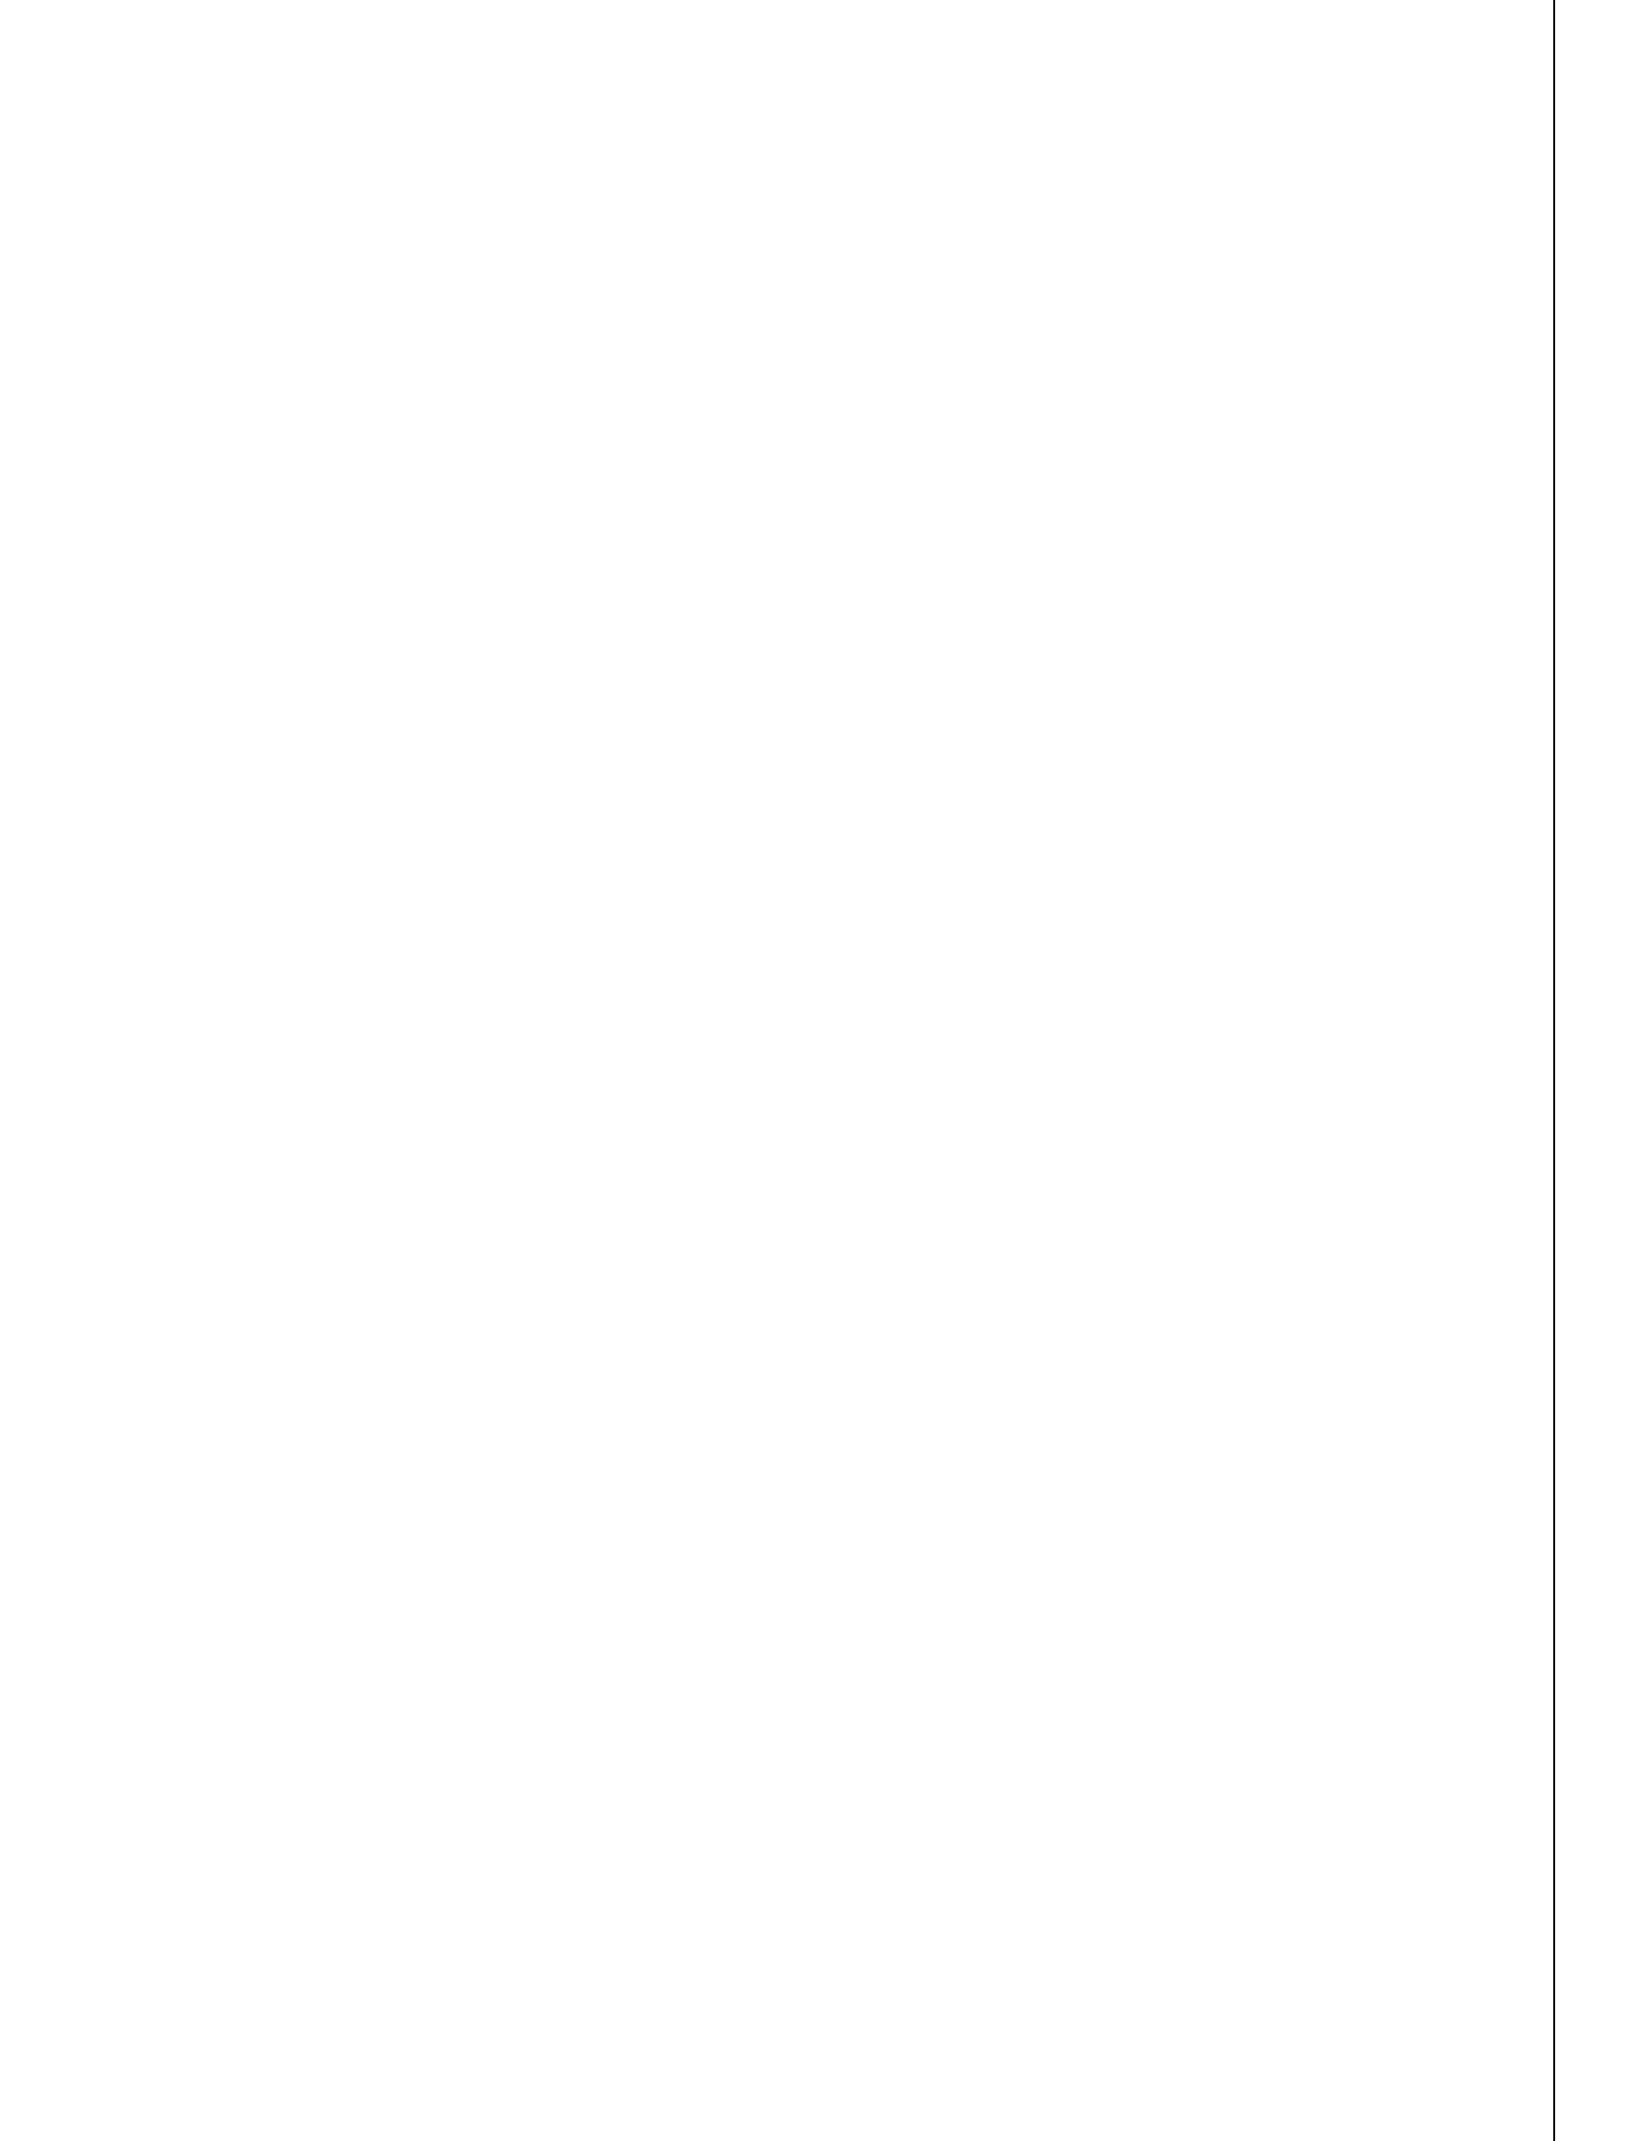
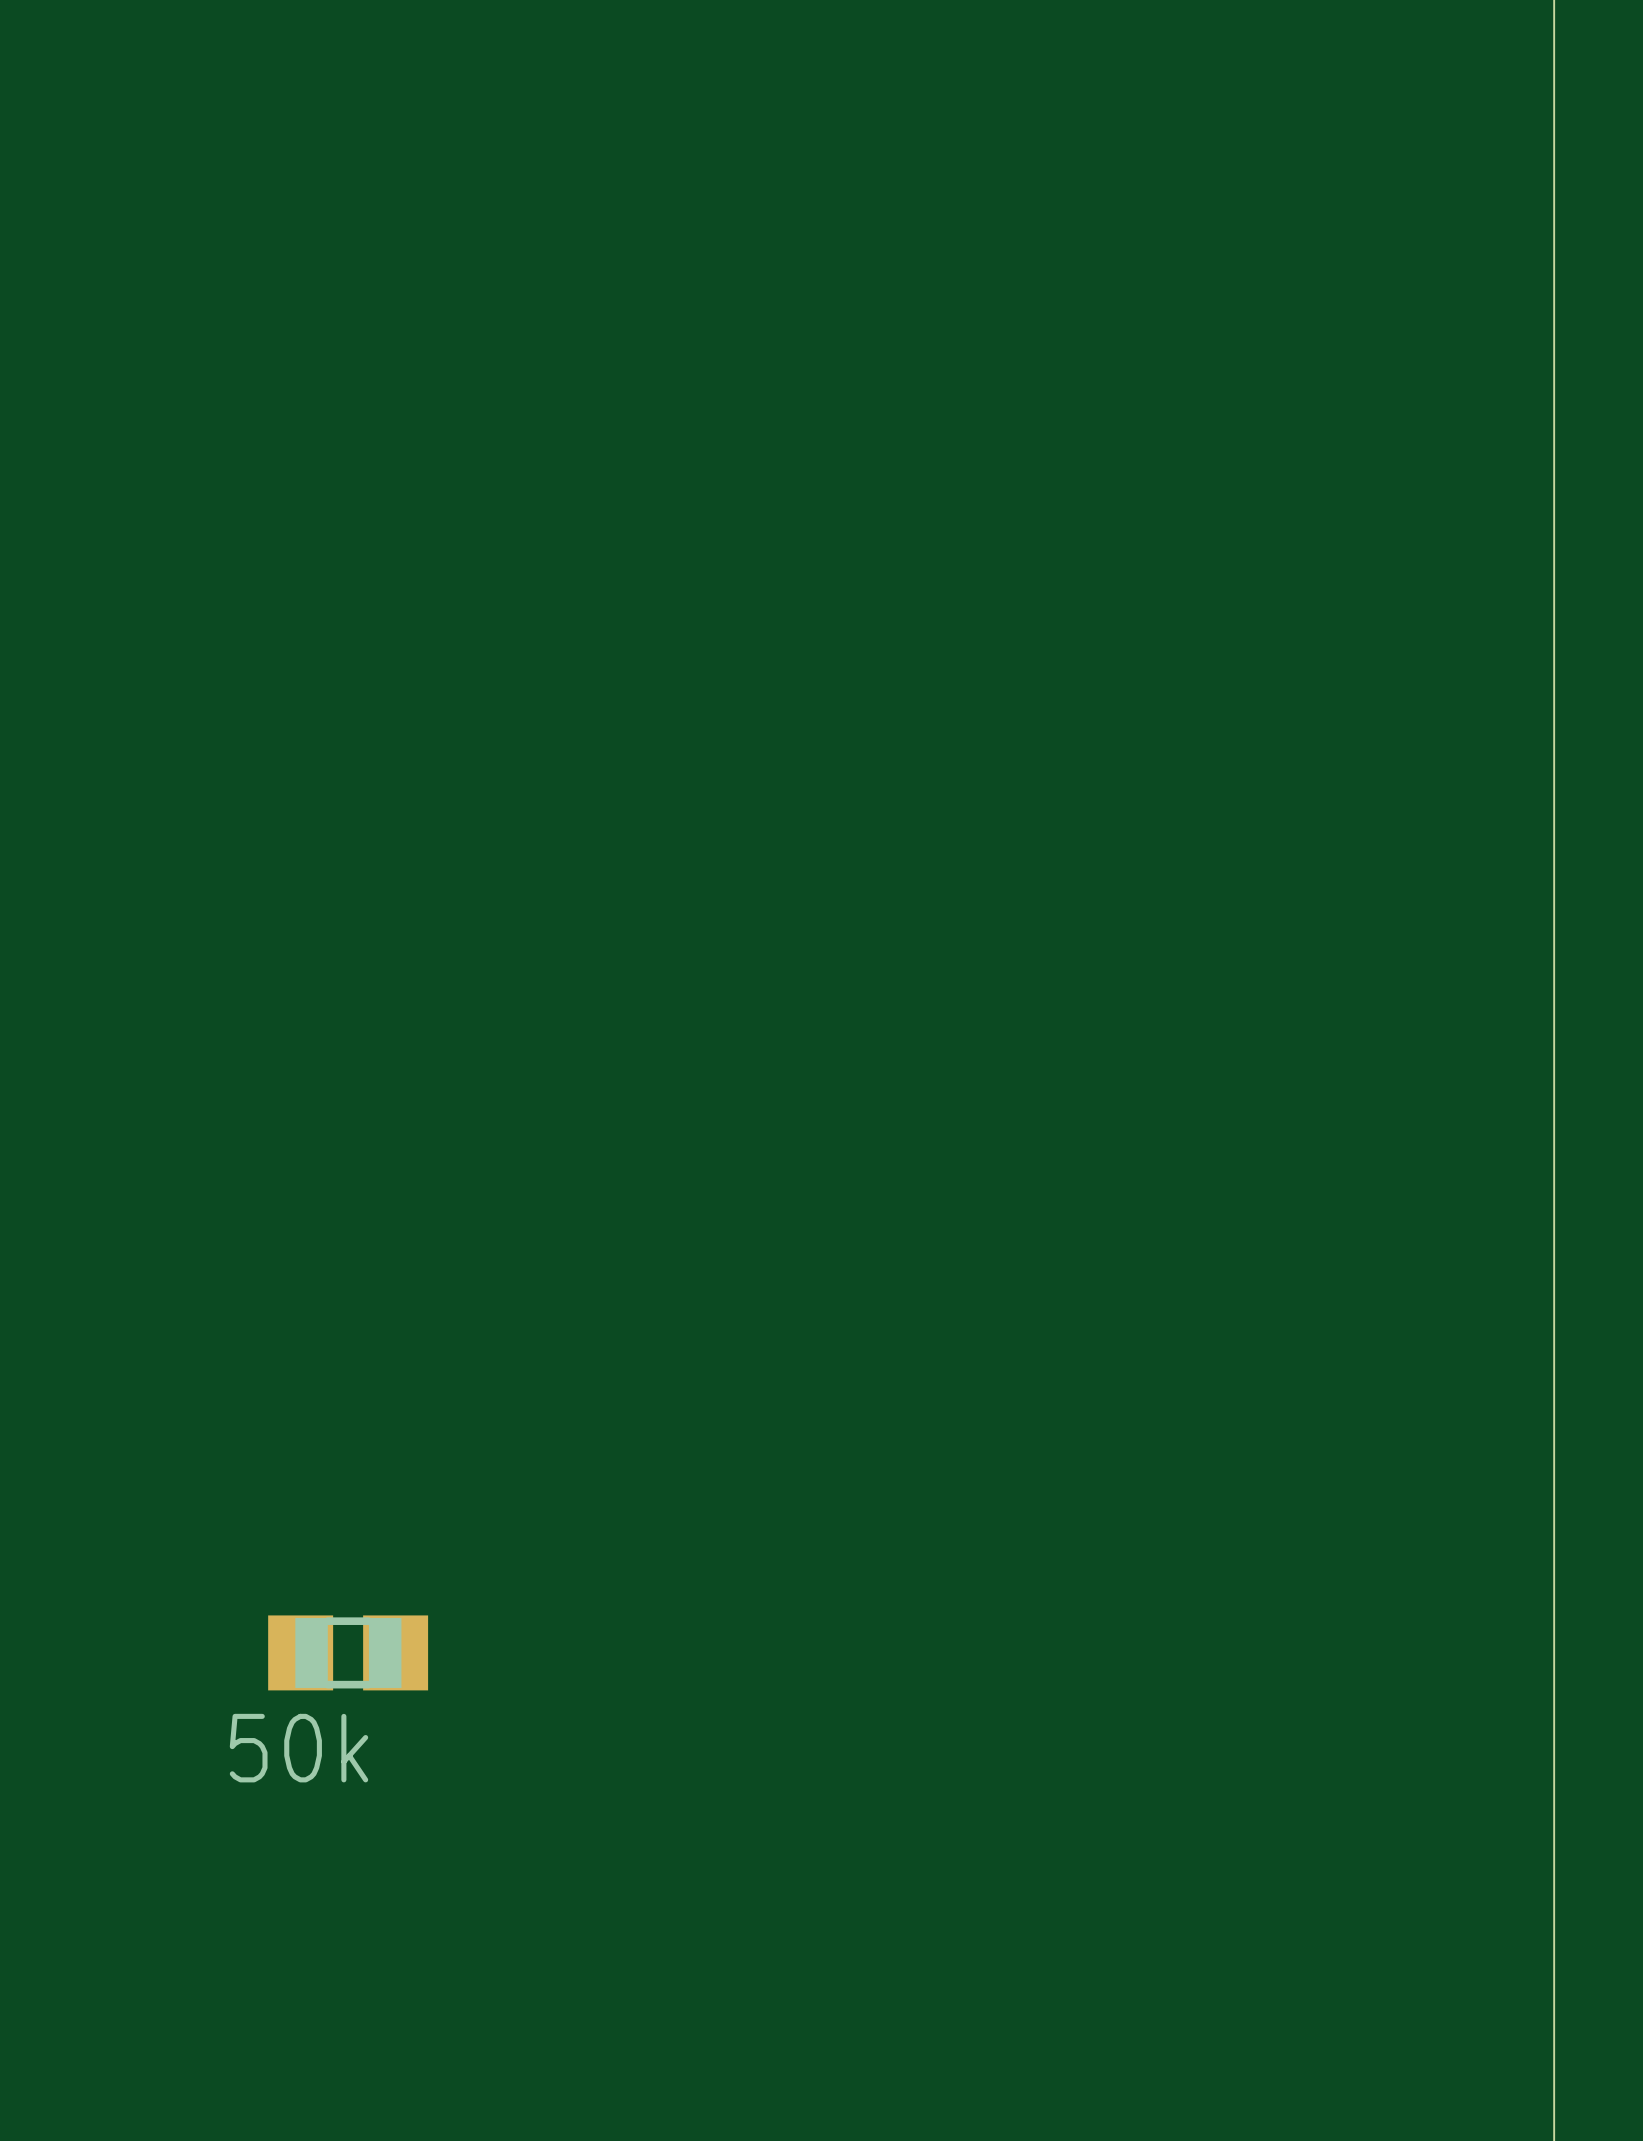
part: none -> 50k (348, 1652)

